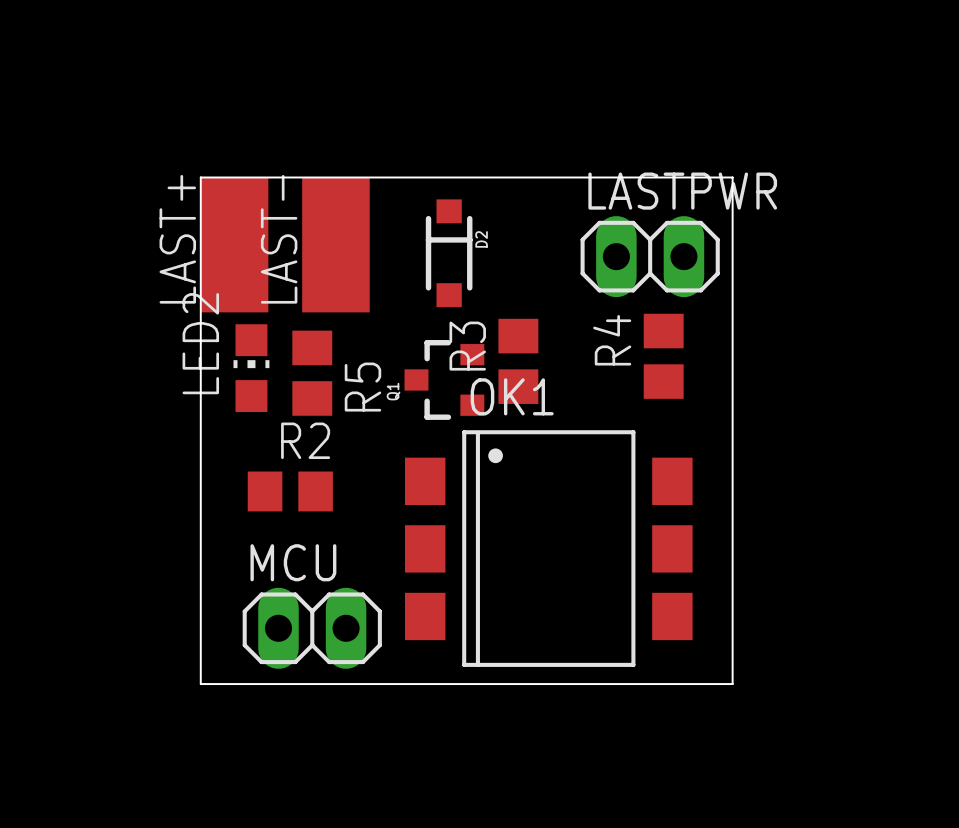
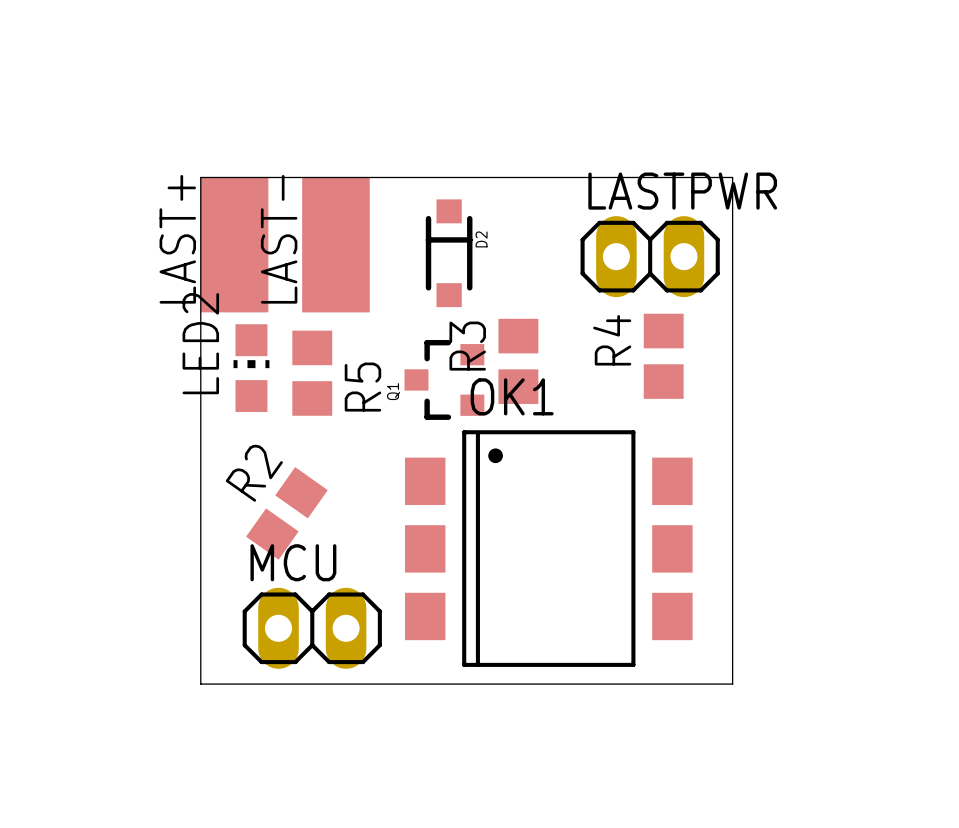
R2 rotation: 0° (290, 491) -> 54.8° counterclockwise (286, 513)

